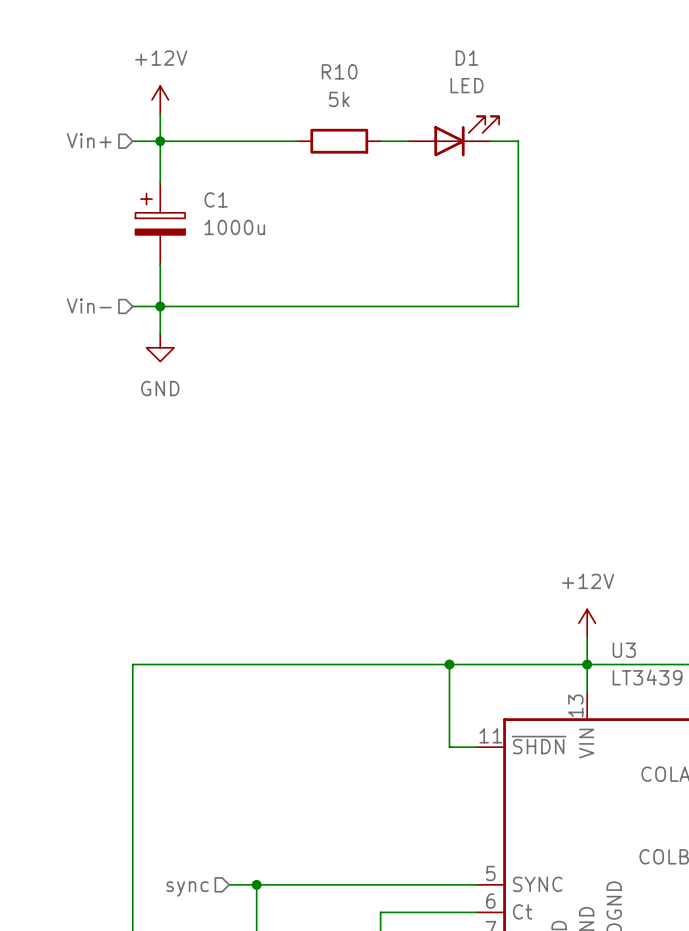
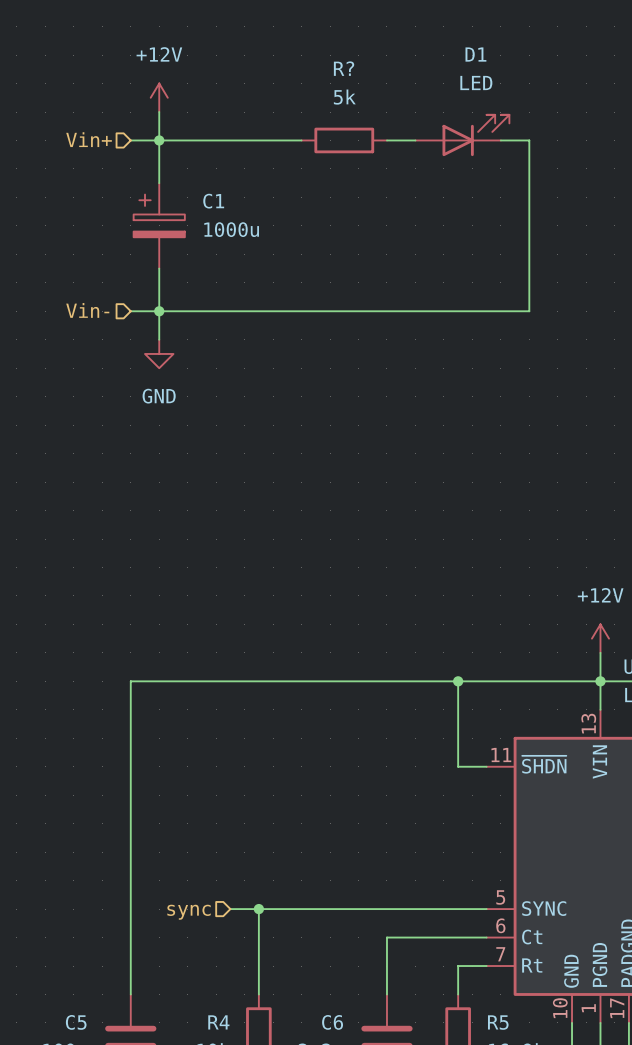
R10 name: R10 (339, 71) -> R? (344, 68)

